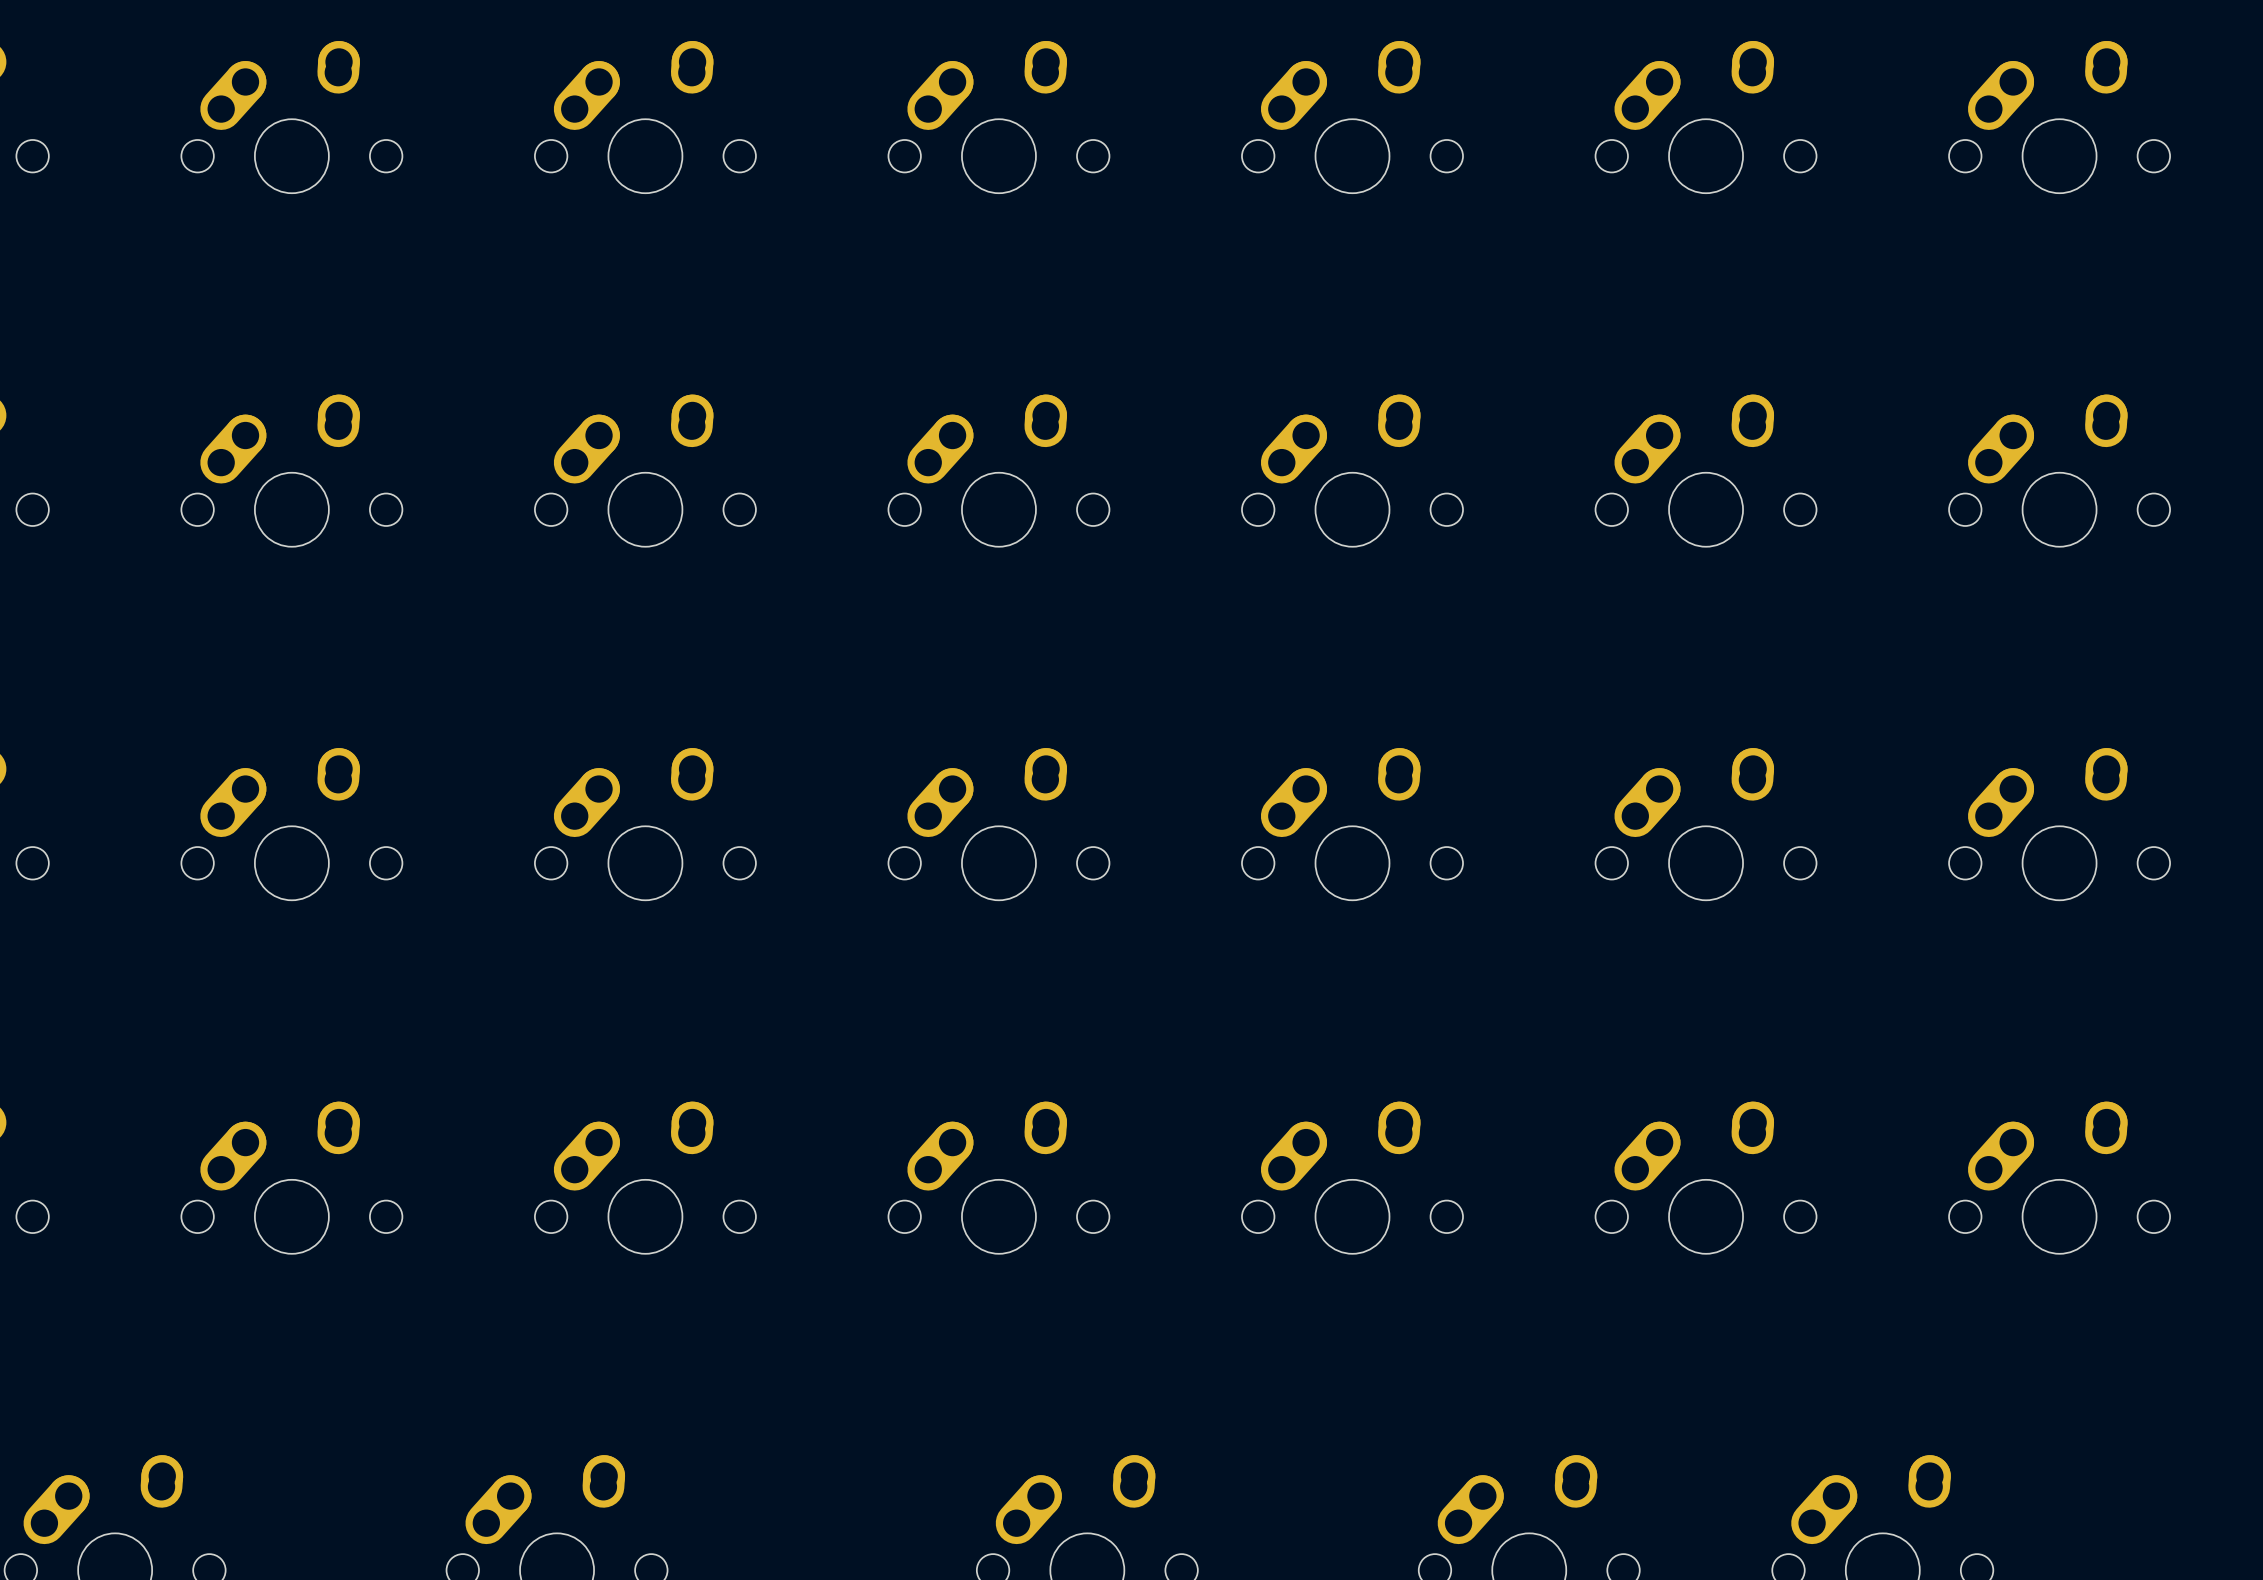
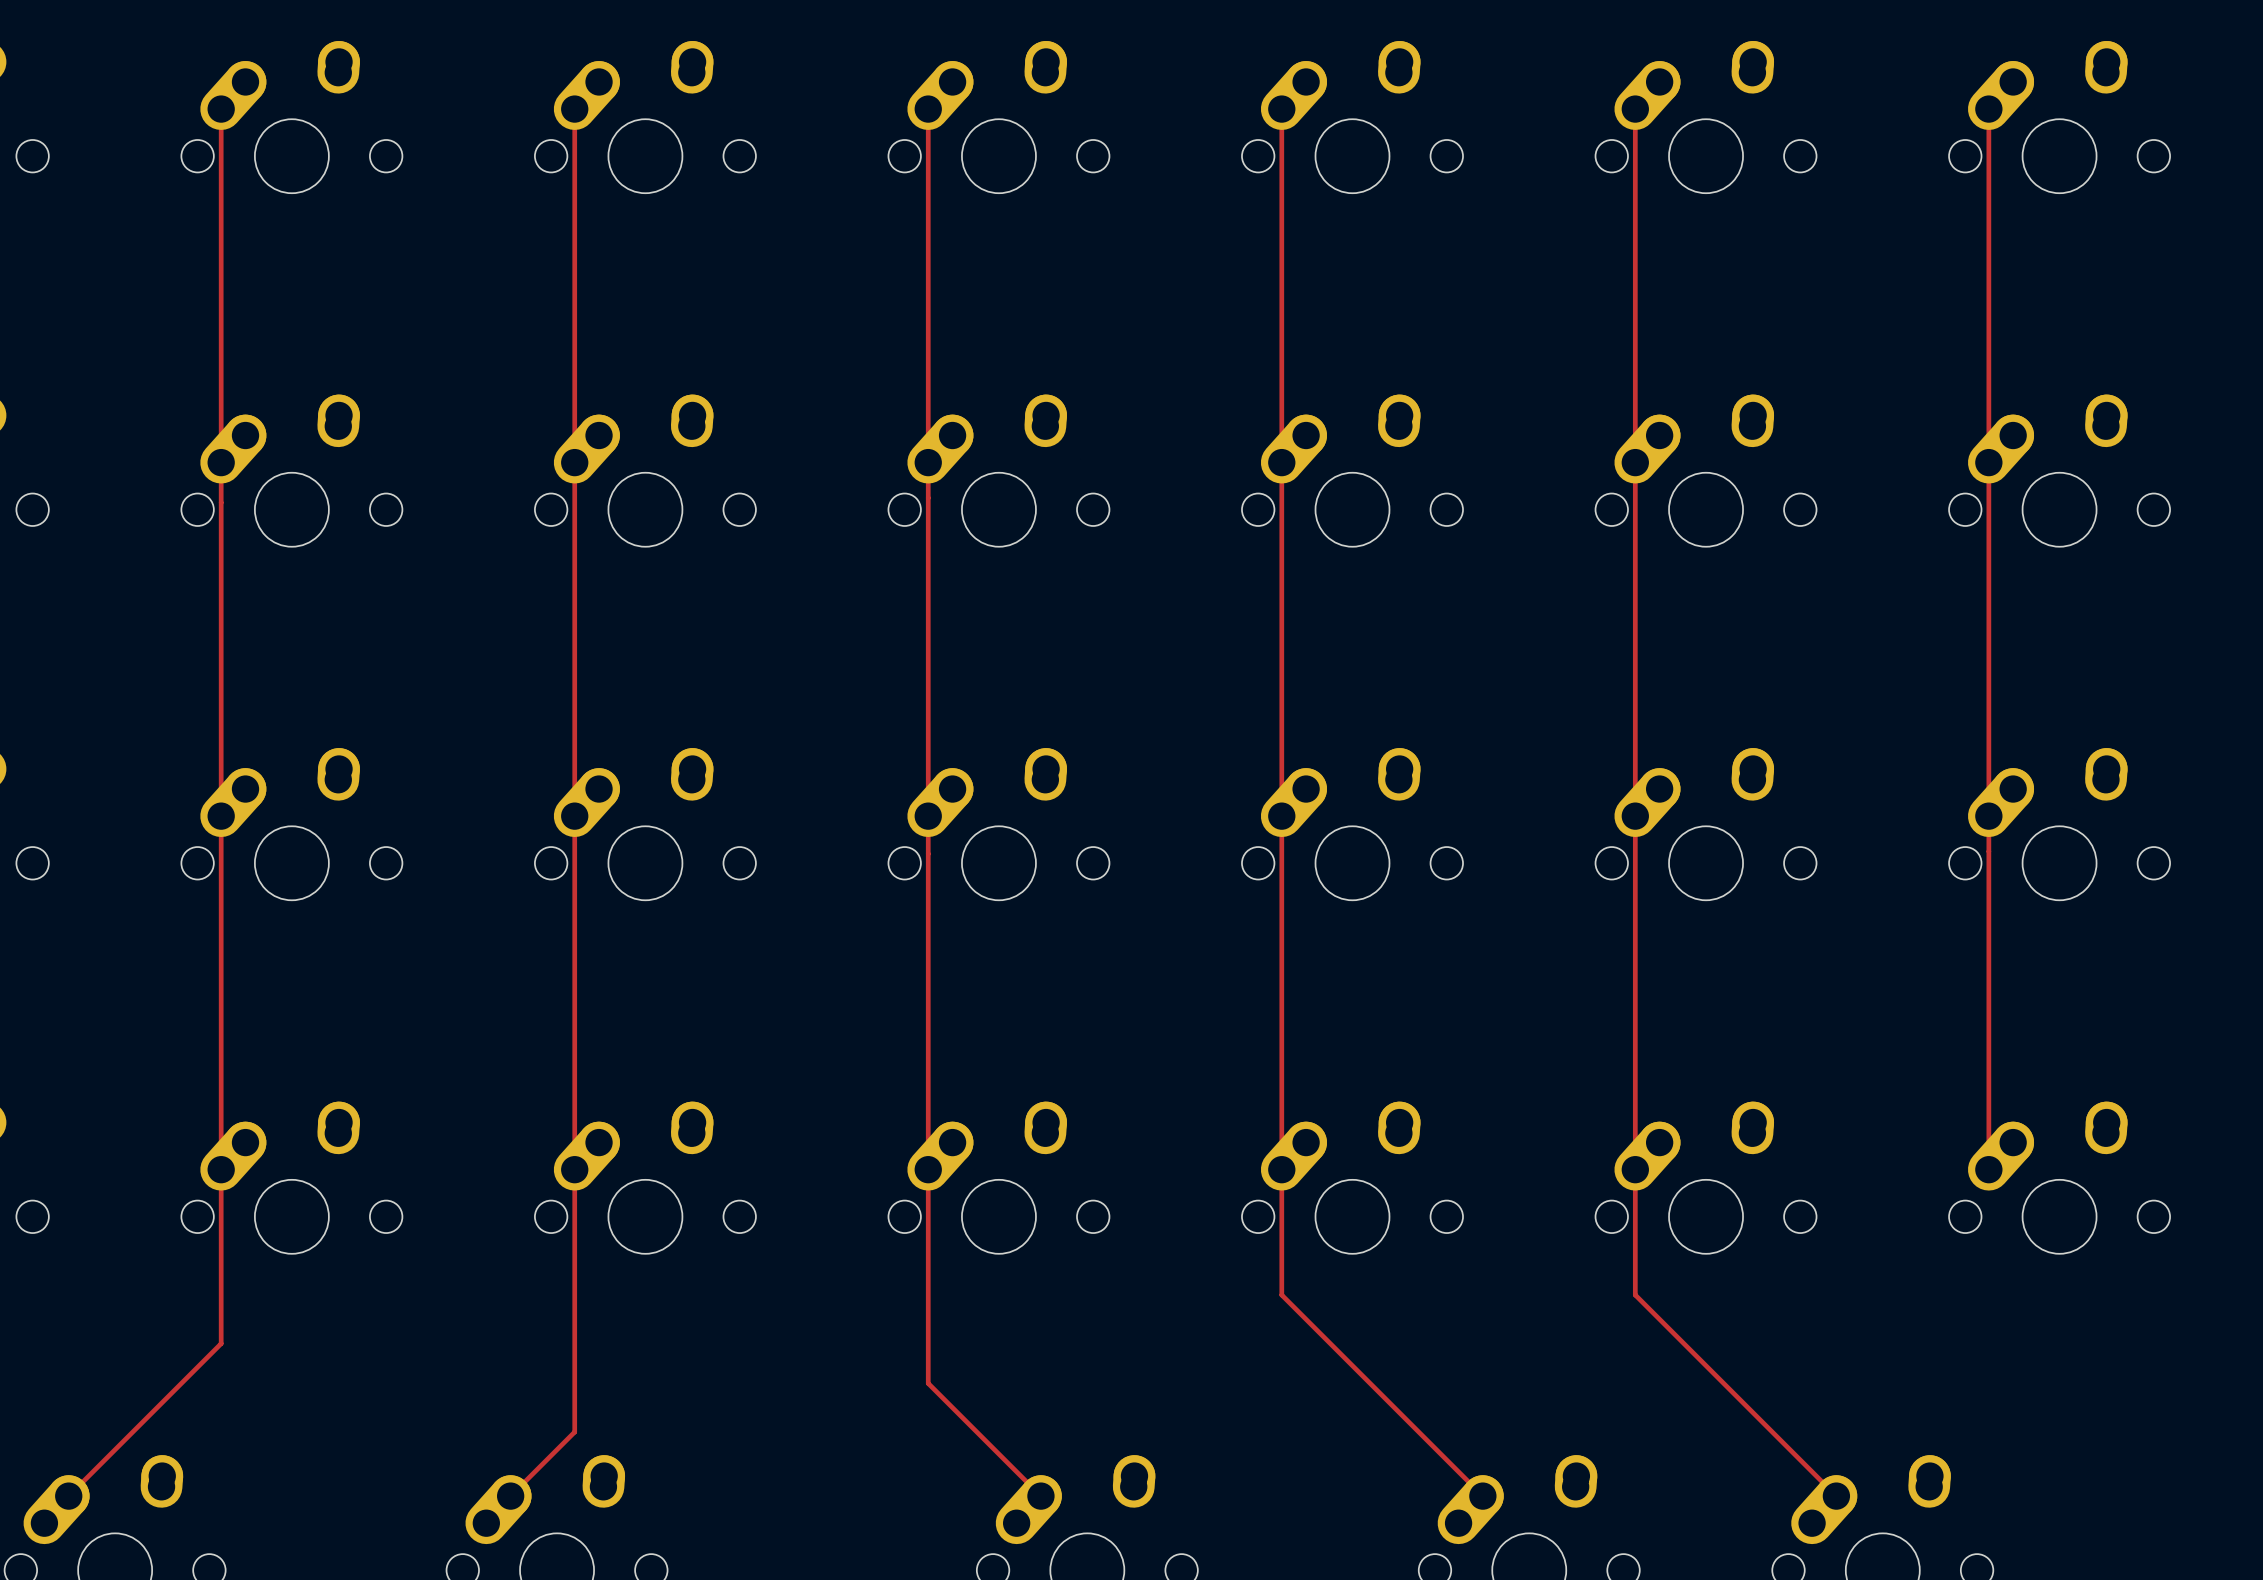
track: none -> (221, 109) (221, 1343) (68, 1496)
track: none -> (574, 109) (574, 1432) (510, 1496)
track: none -> (928, 109) (928, 1383) (1040, 1496)
track: none -> (1281, 109) (1281, 1295) (1482, 1496)
track: none -> (1635, 109) (1635, 1295) (1836, 1496)
track: none -> (1988, 109) (1988, 1169)

